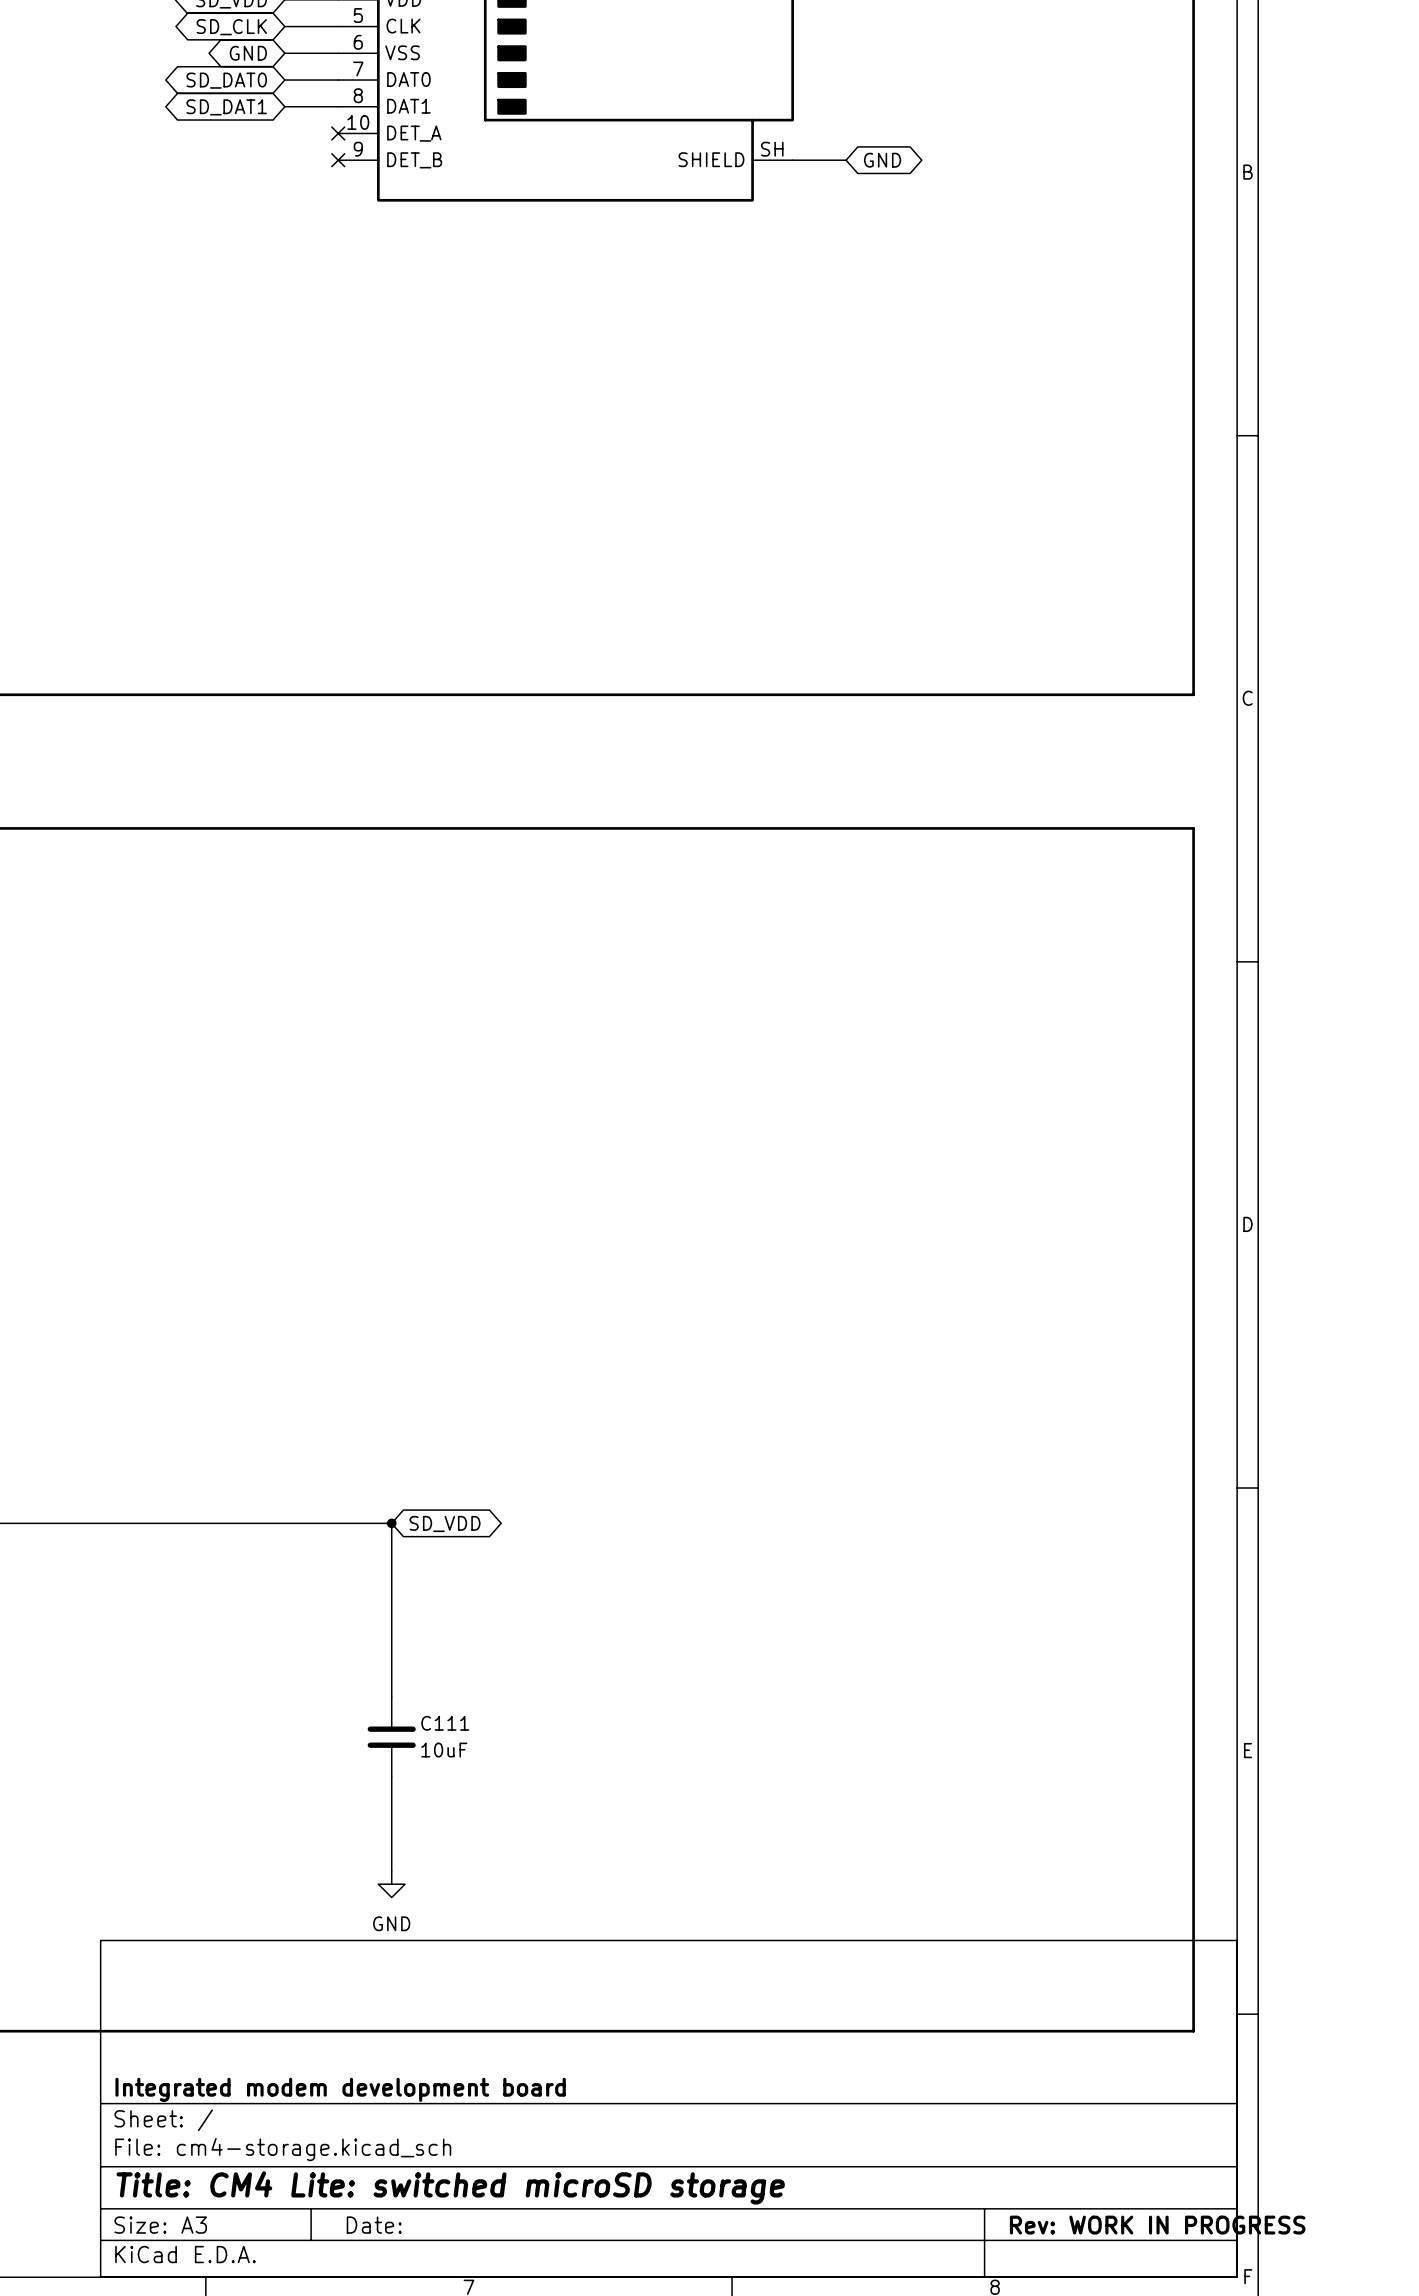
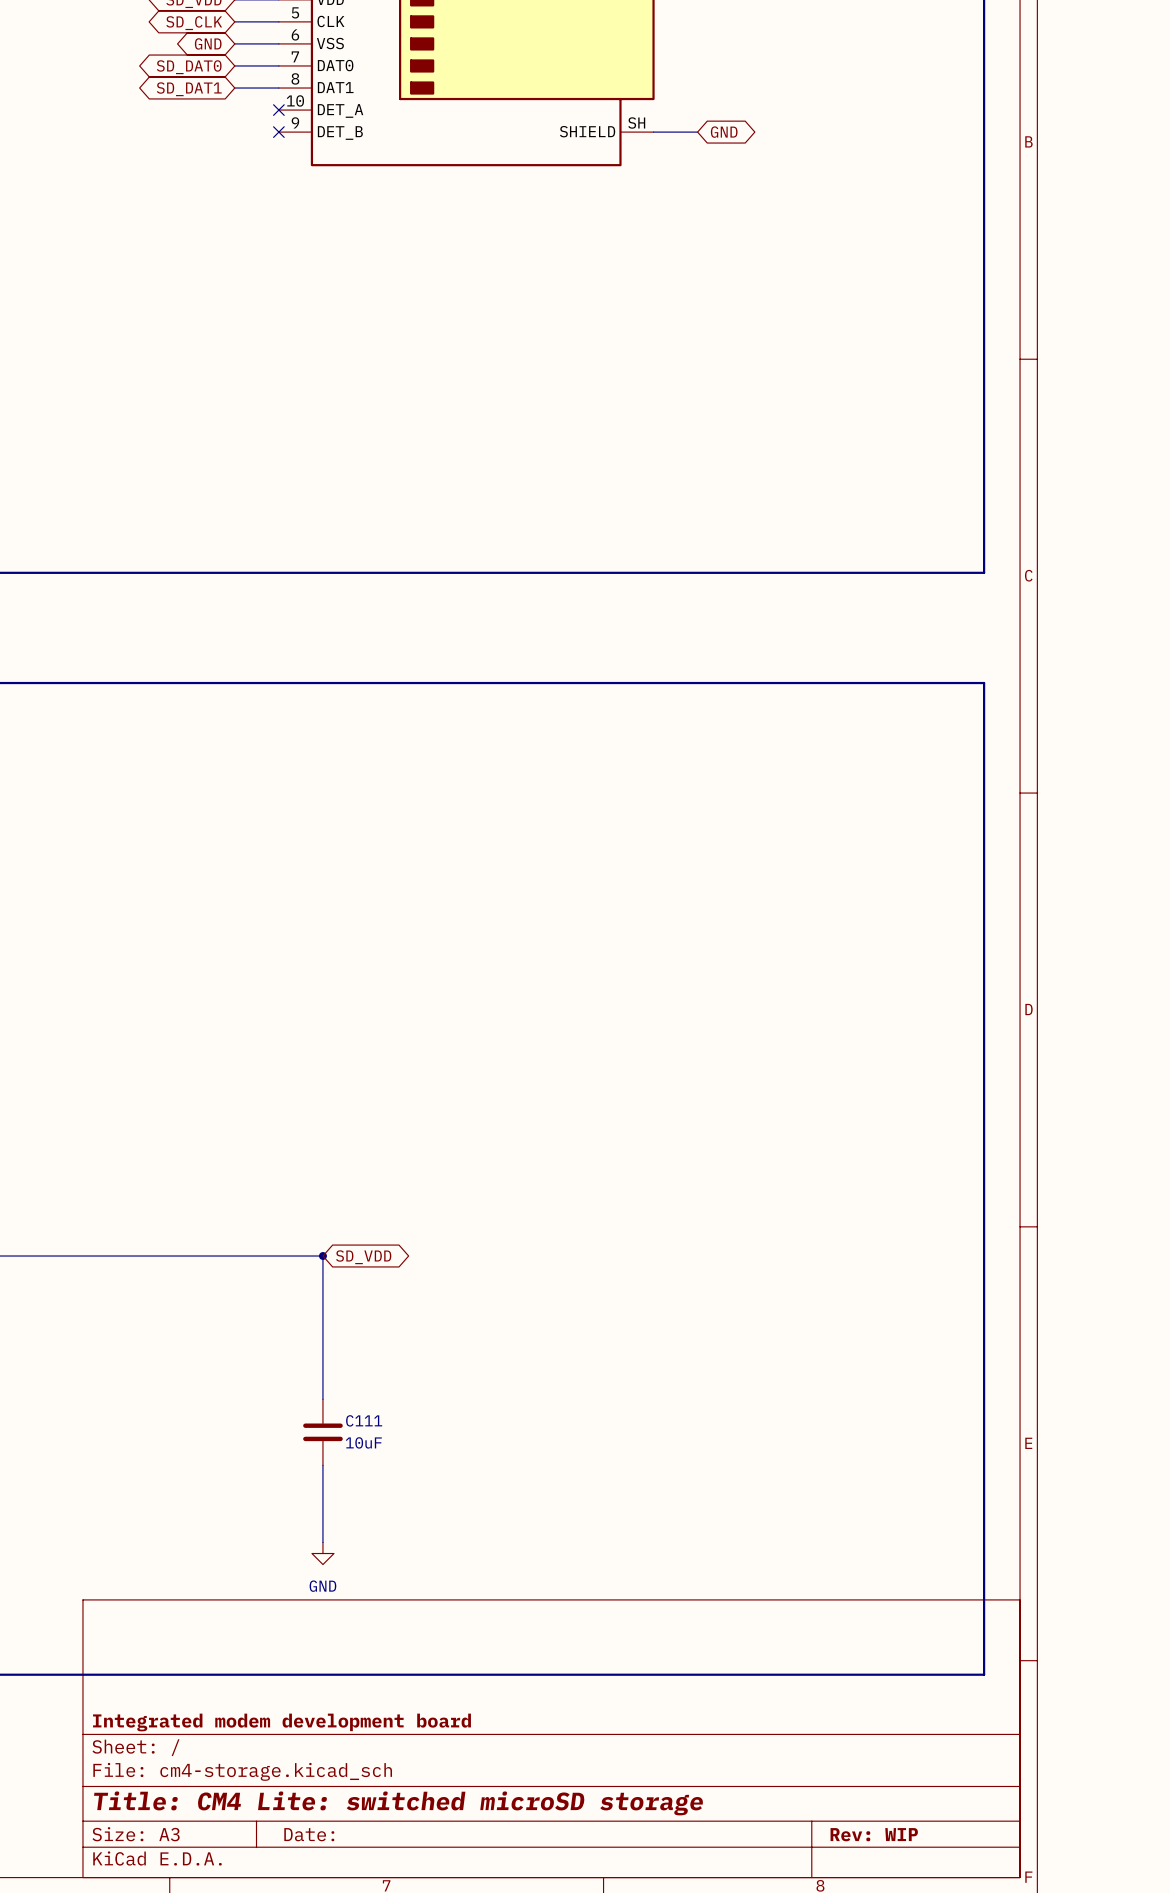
title block: Rev: WORK IN PROGRESS (1157, 2225) -> Rev: WIP (874, 1834)

